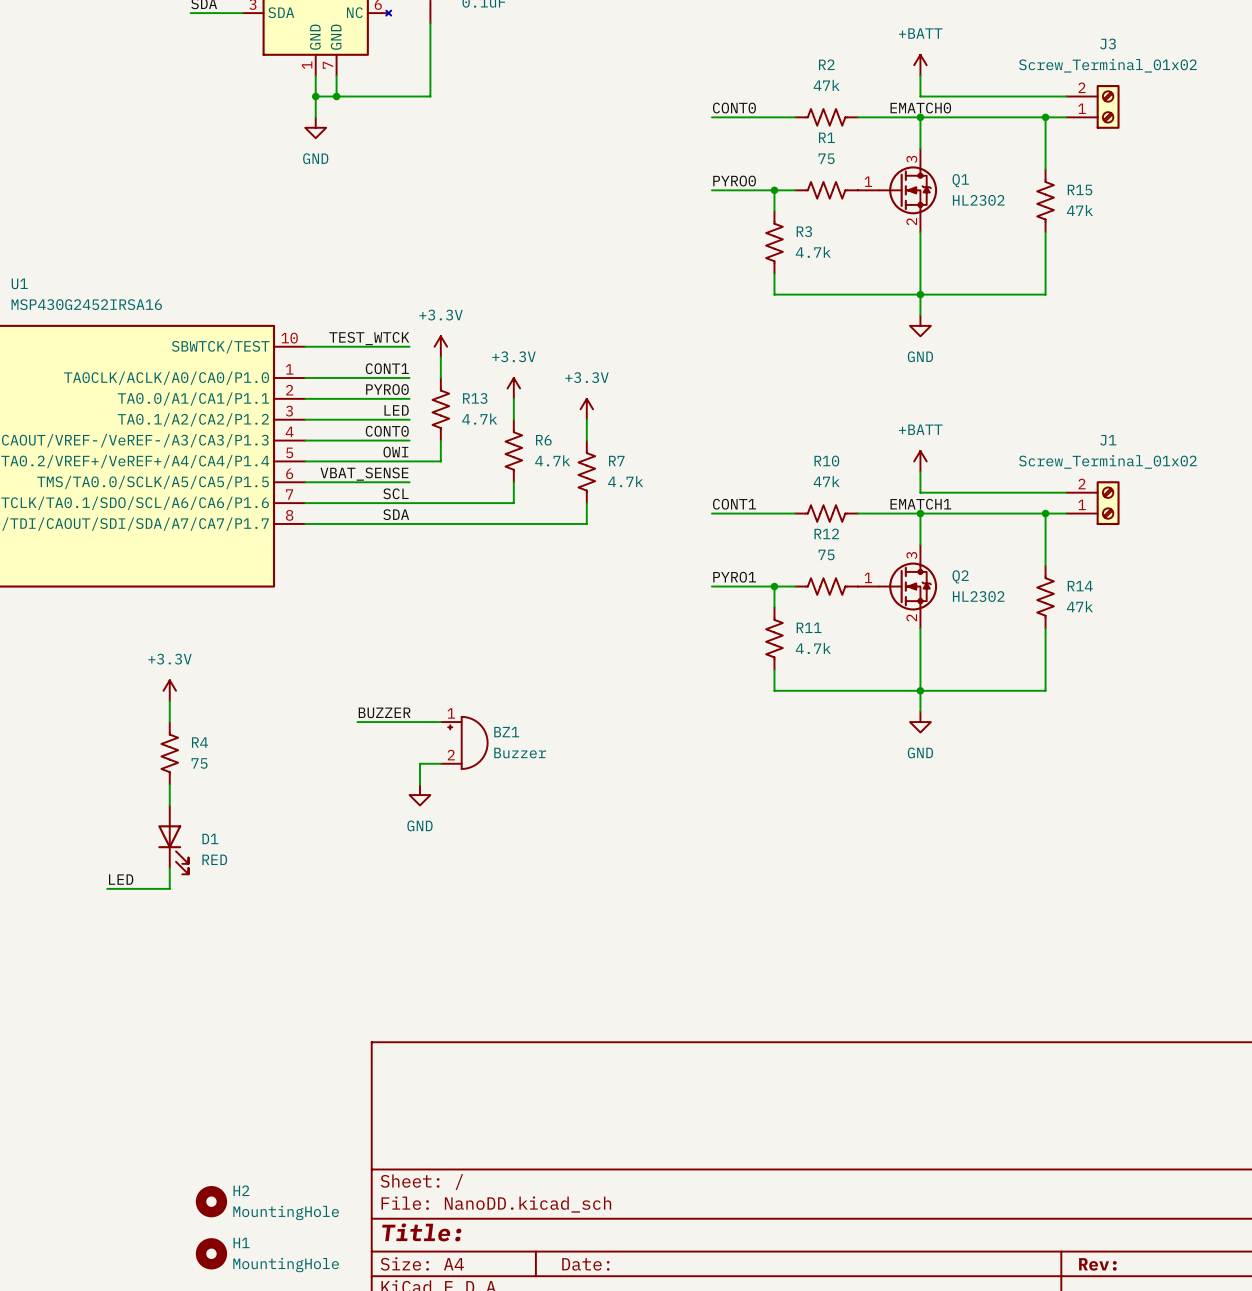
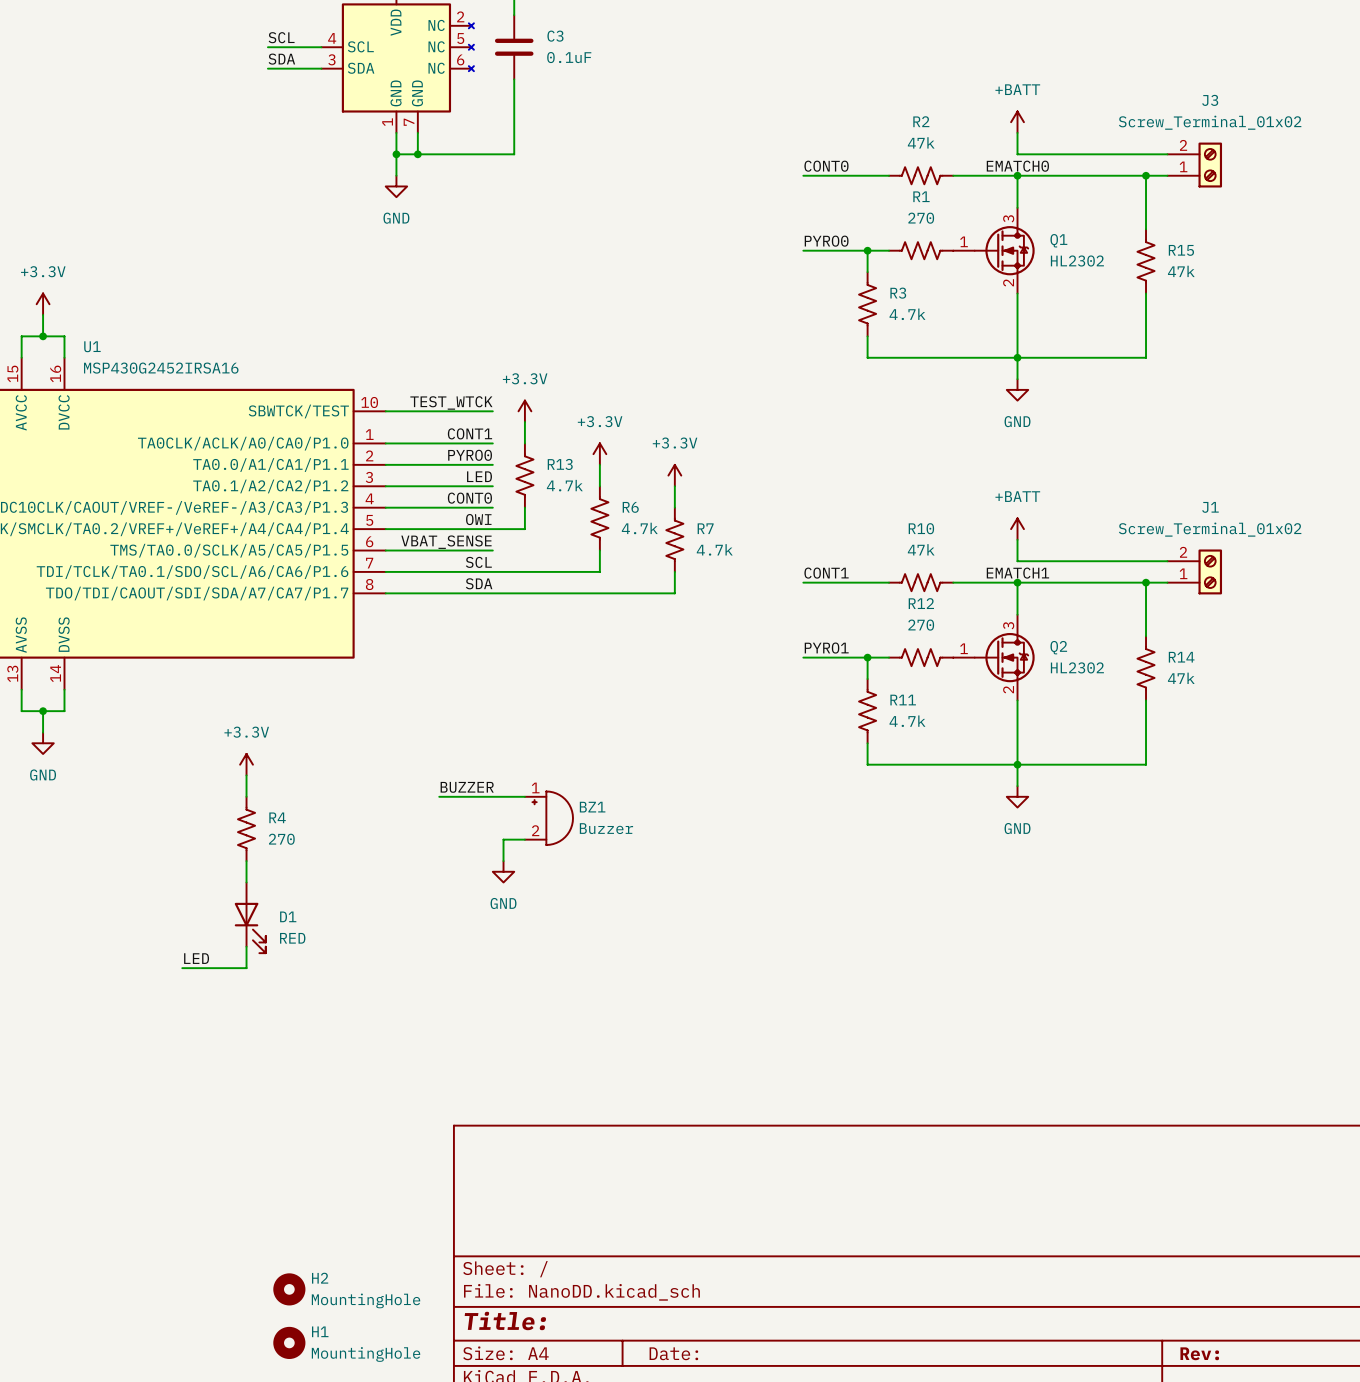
R1 value: 75 (826, 158) -> 270 (921, 218)
R12 value: 75 (826, 554) -> 270 (921, 625)
R4 value: 75 (199, 763) -> 270 (281, 839)

